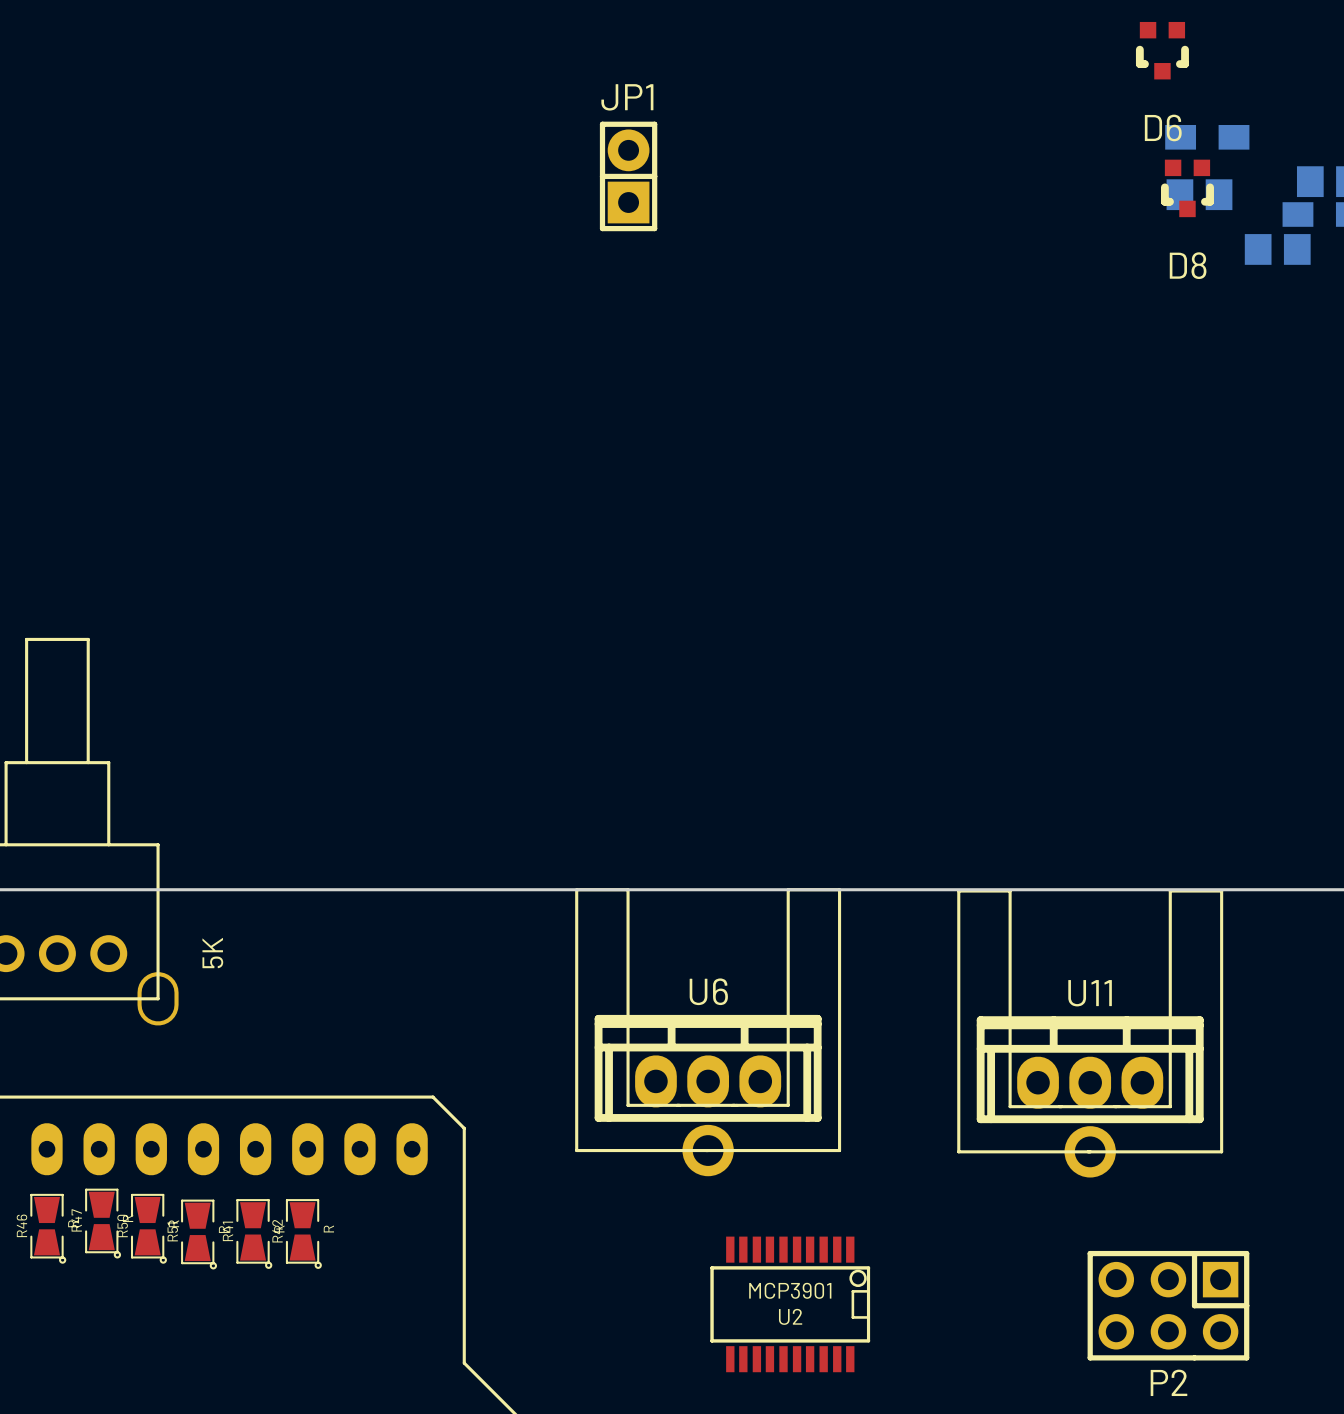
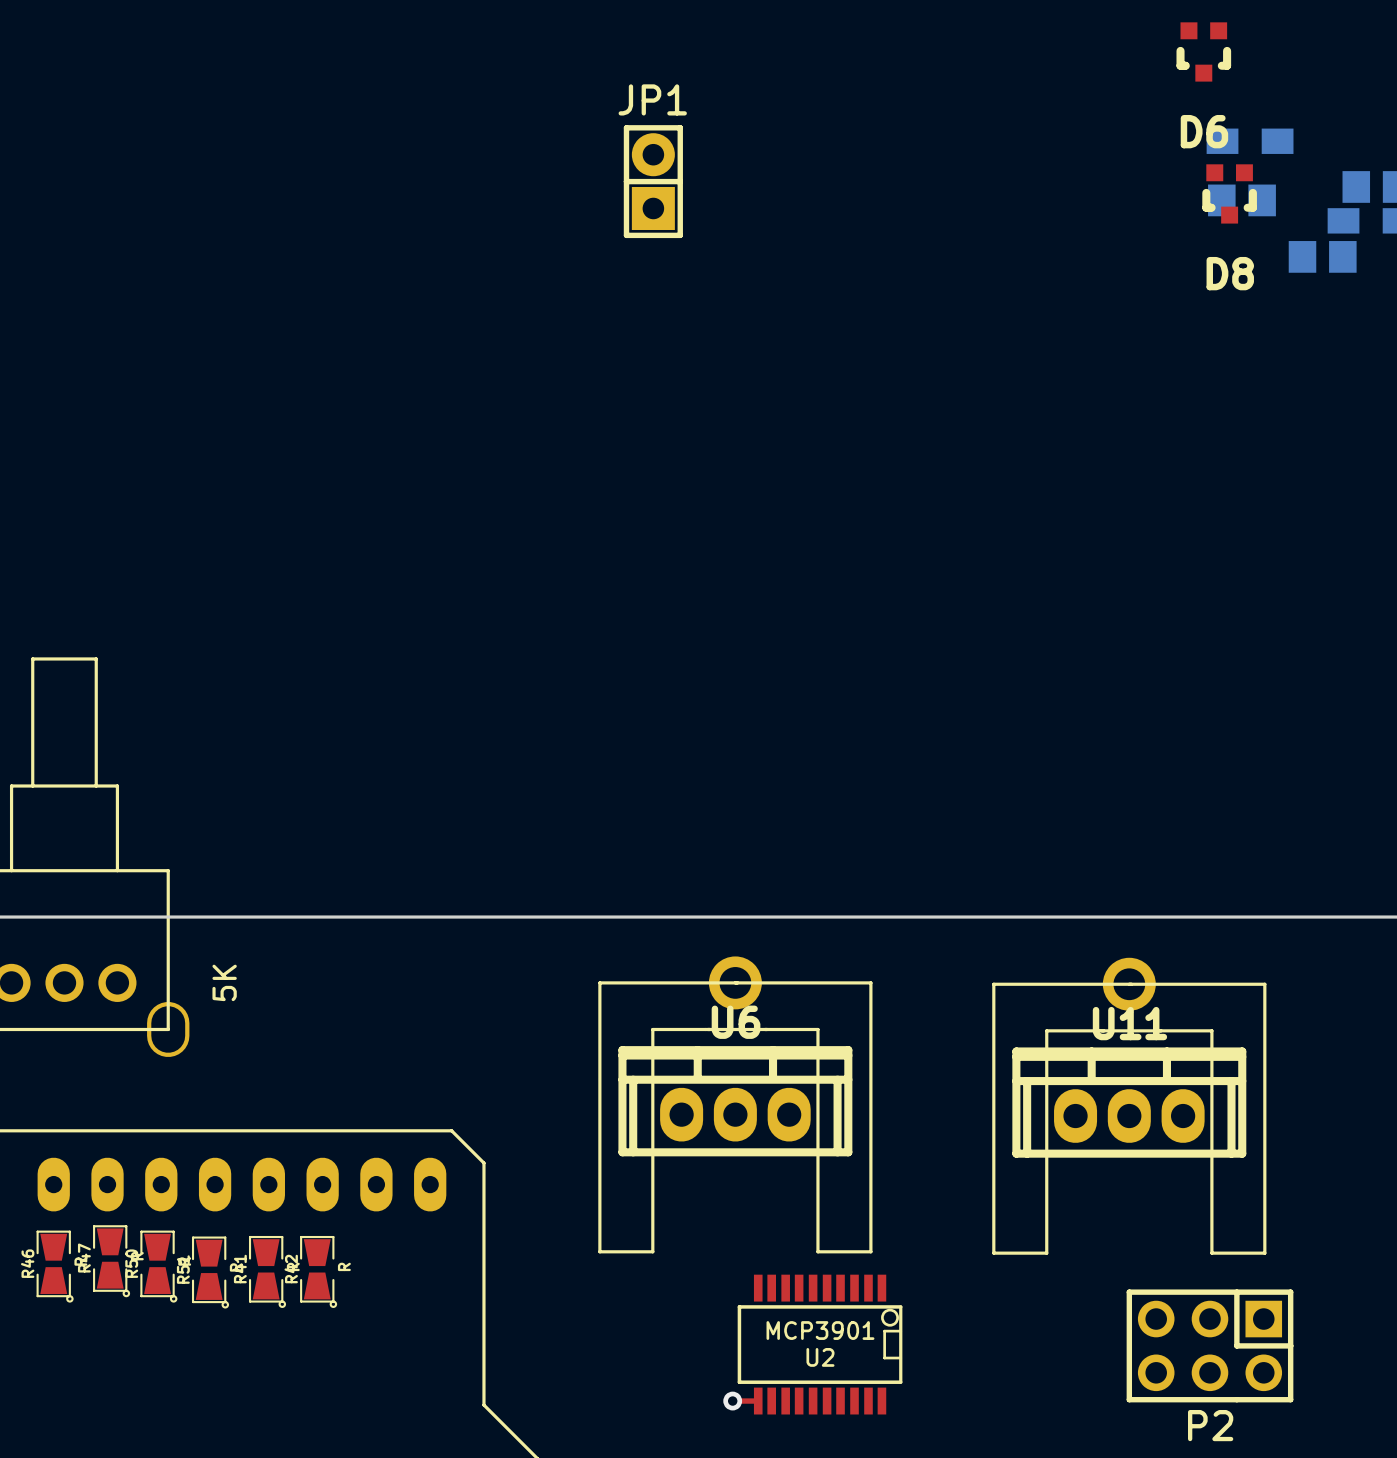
part rotation: 0° (708, 1032) -> 180° (735, 1104)
part rotation: 0° (1090, 1033) -> 180° (1129, 1106)
top track: none -> (732, 1401) (758, 1401)
via: none -> (732, 1401)

